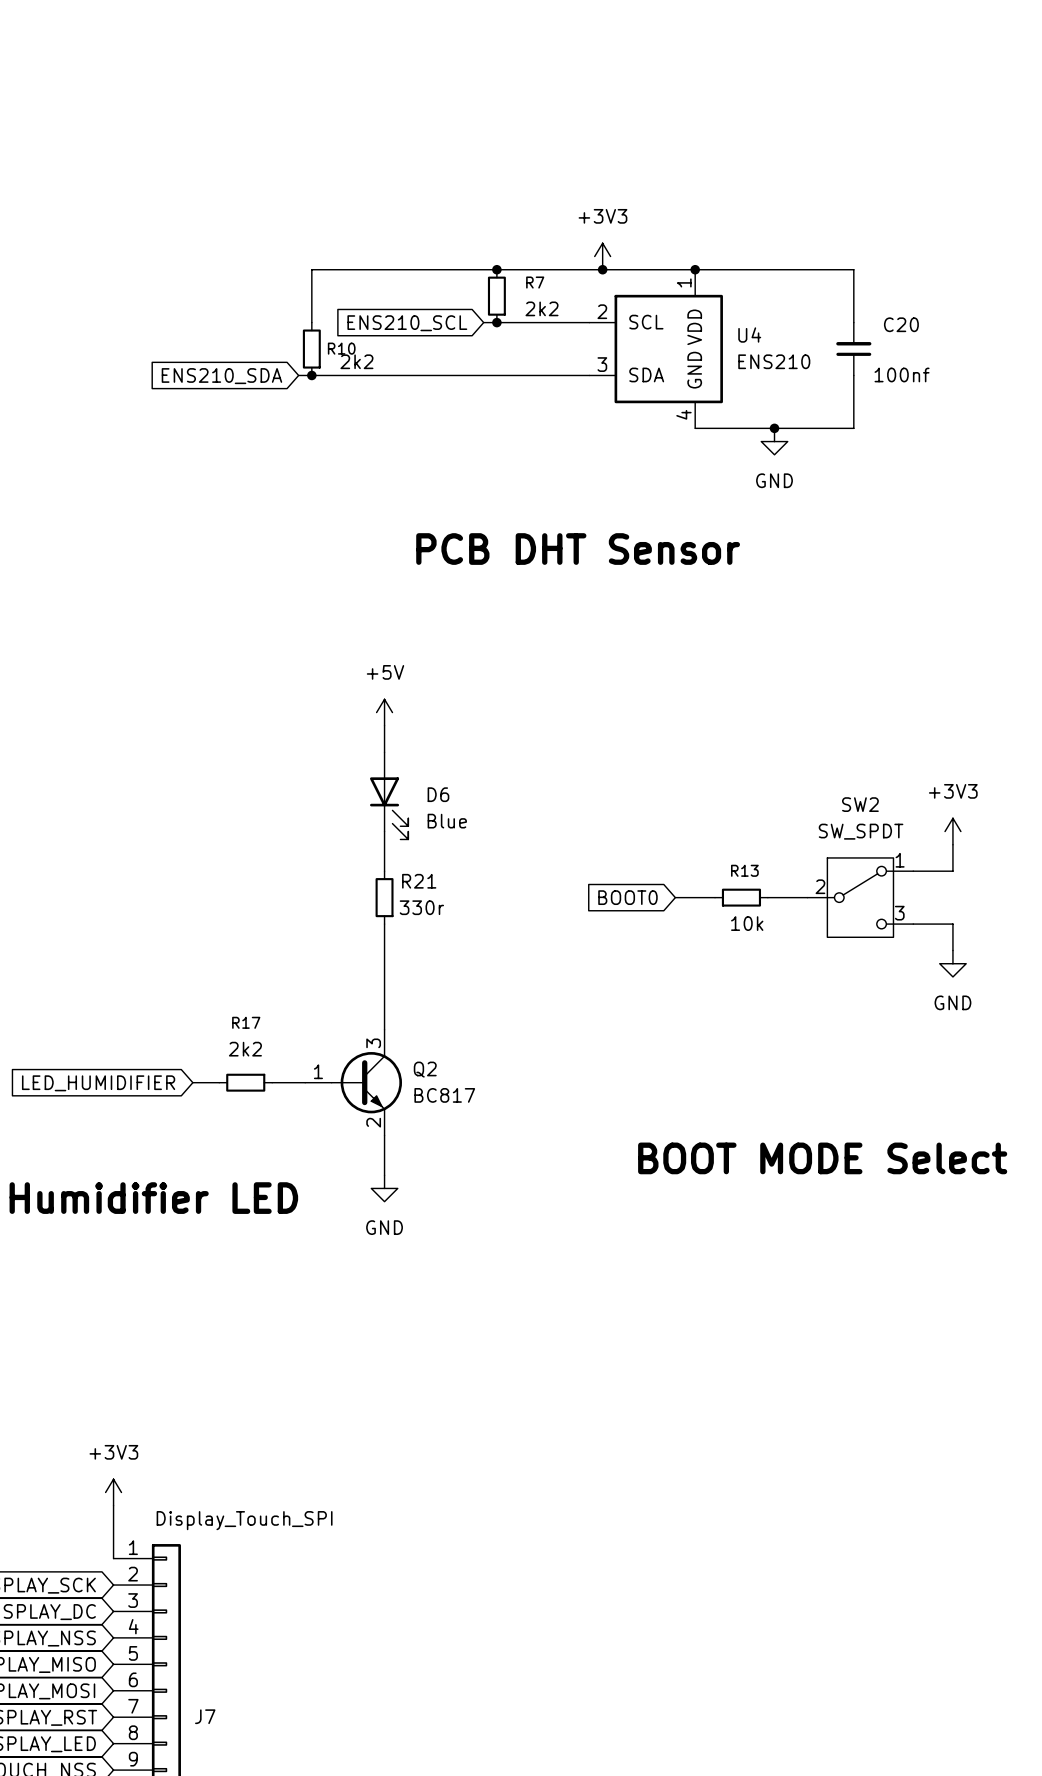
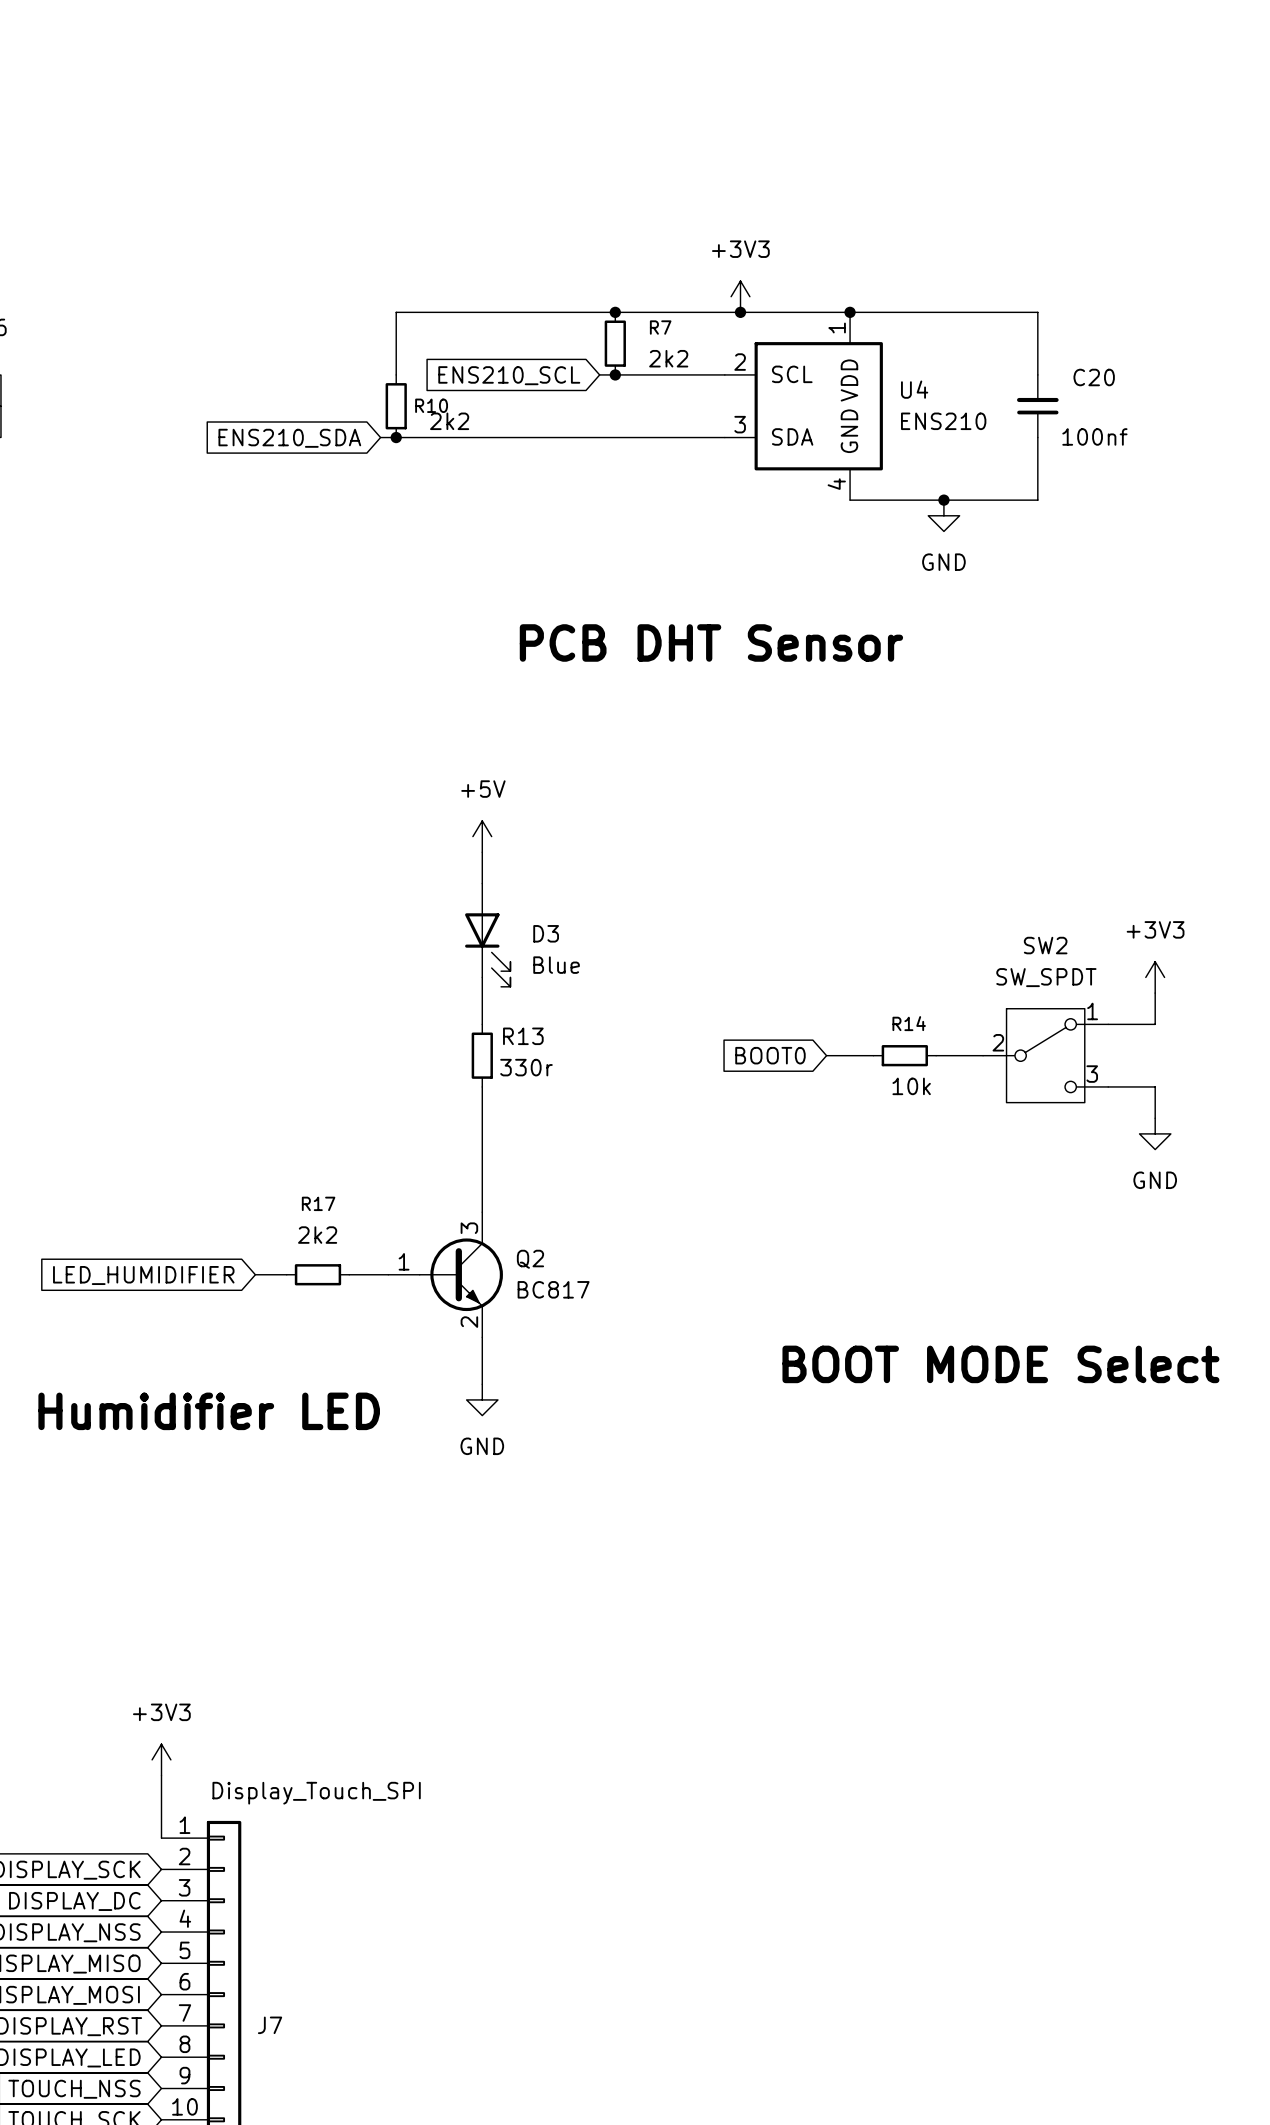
D6 name: D6 (438, 794) -> D3 (546, 933)
R13 name: R13 (744, 870) -> R14 (909, 1023)
R21 name: R21 (419, 881) -> R13 (523, 1036)

